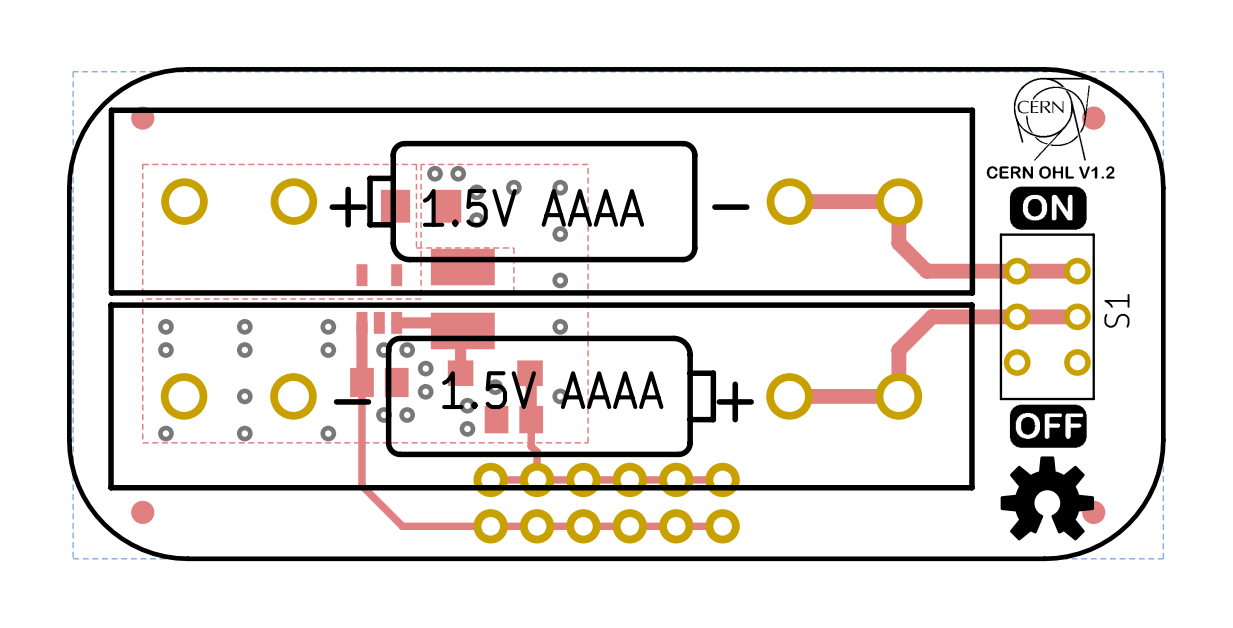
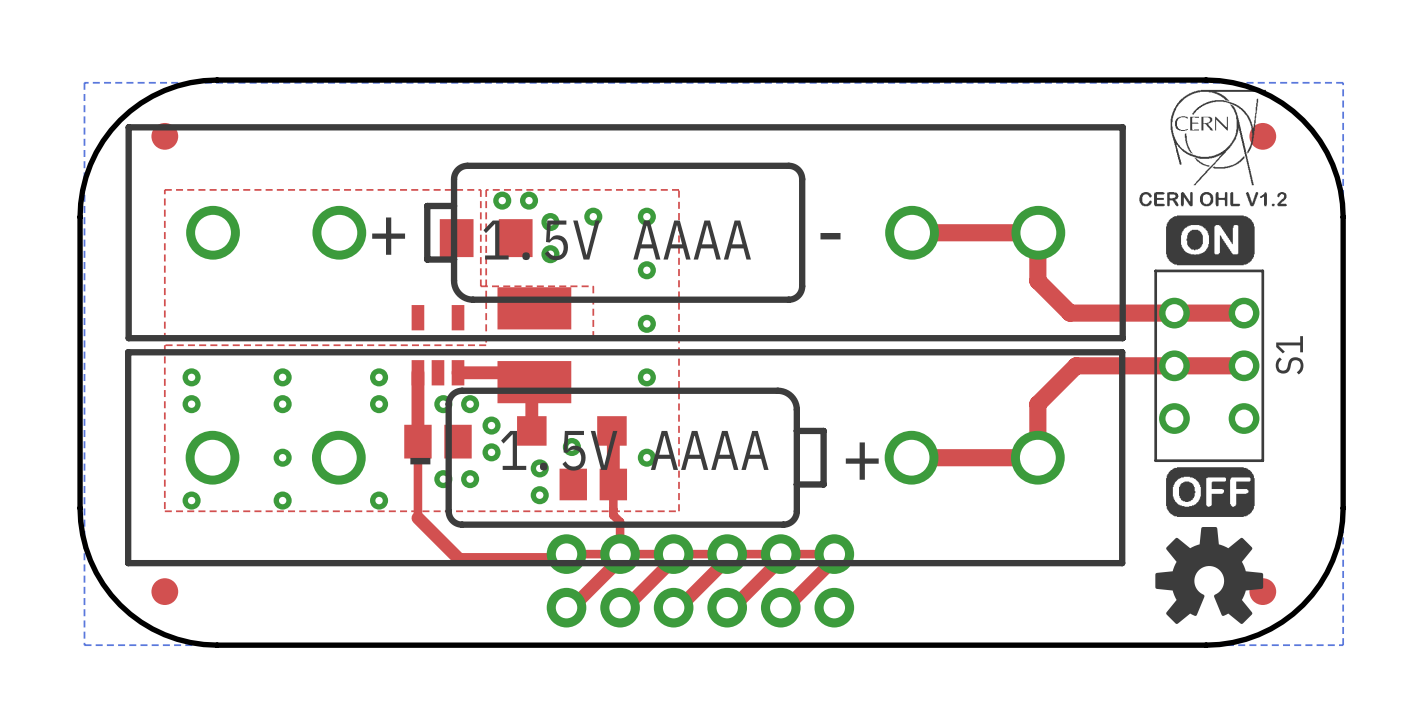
top track: (361, 448) (361, 485) (402, 526) (722, 526) -> (417, 518) (459, 559) (566, 559)
top track: none -> (620, 559) (566, 613)
top track: none -> (673, 559) (620, 613)
top track: none -> (727, 559) (673, 613)
top track: none -> (780, 559) (727, 613)
top track: none -> (834, 559) (780, 613)

